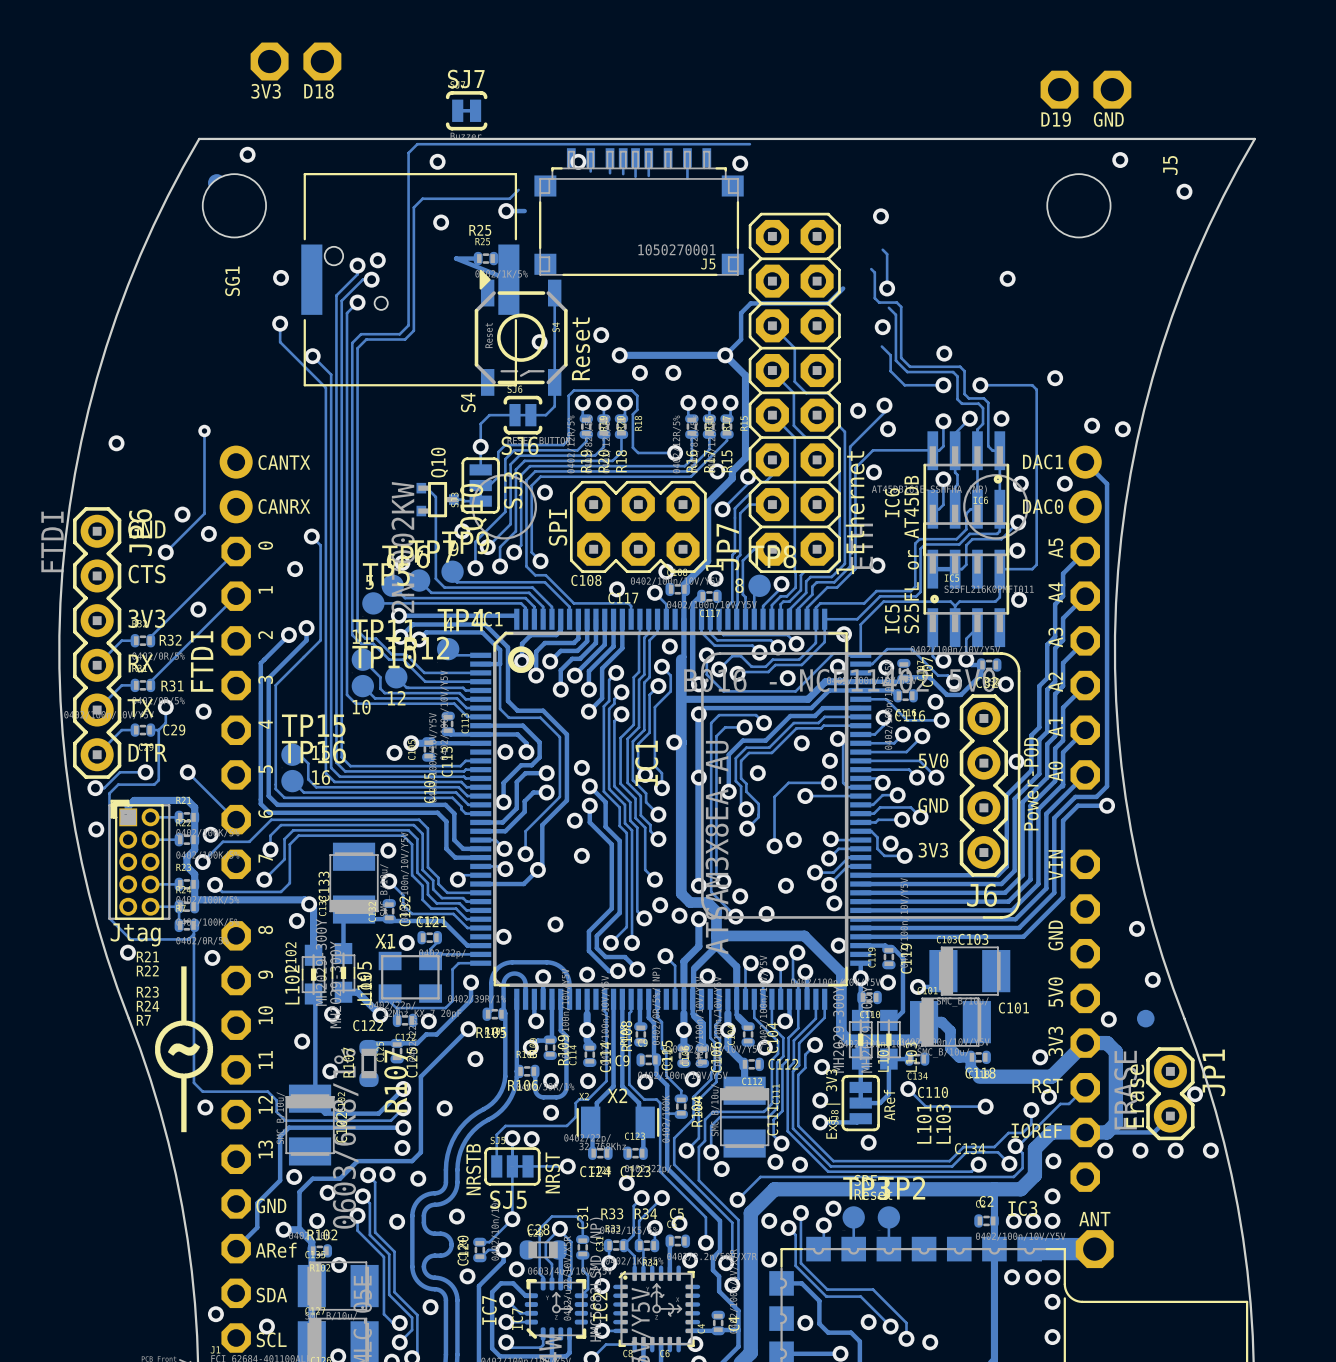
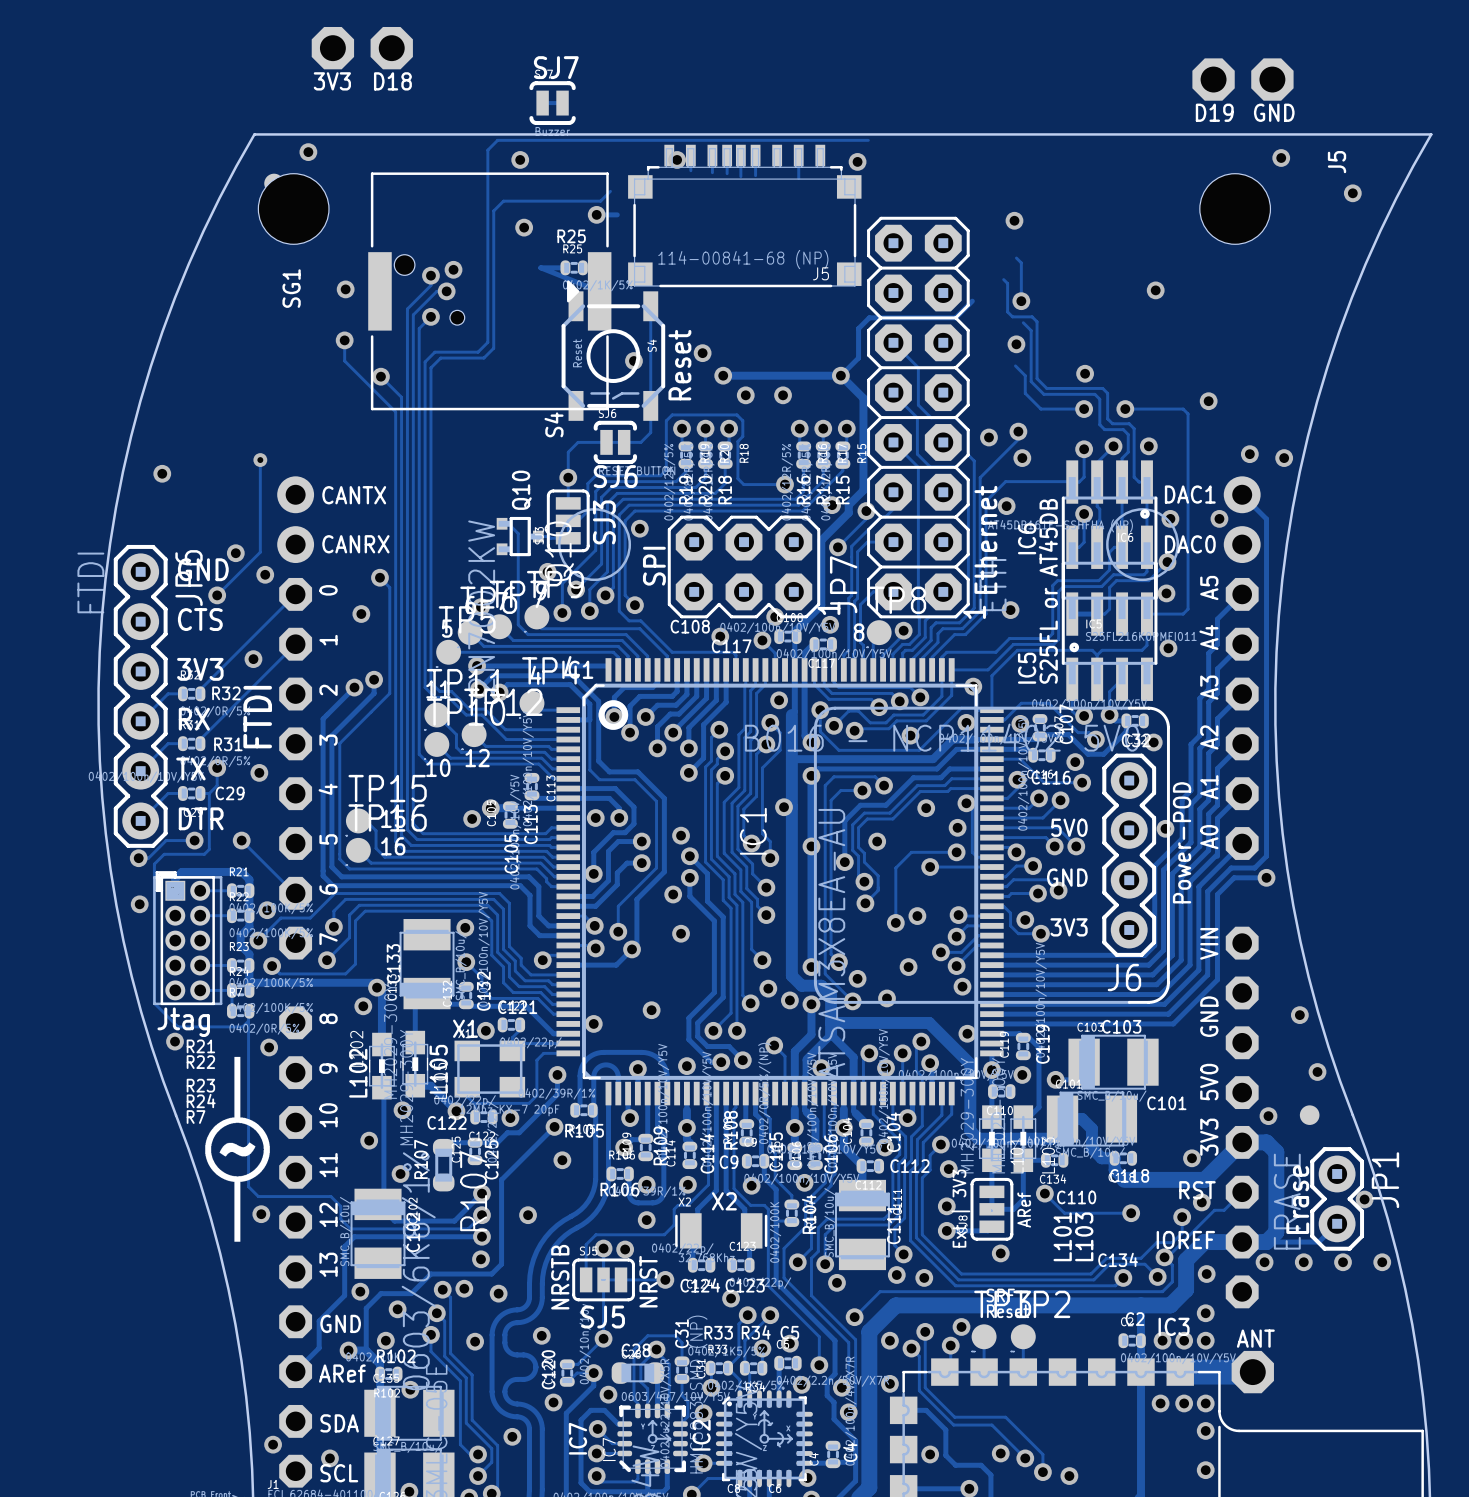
J5 value: 1050270001 (676, 249) -> 114-00841-68 (NP) (743, 259)

